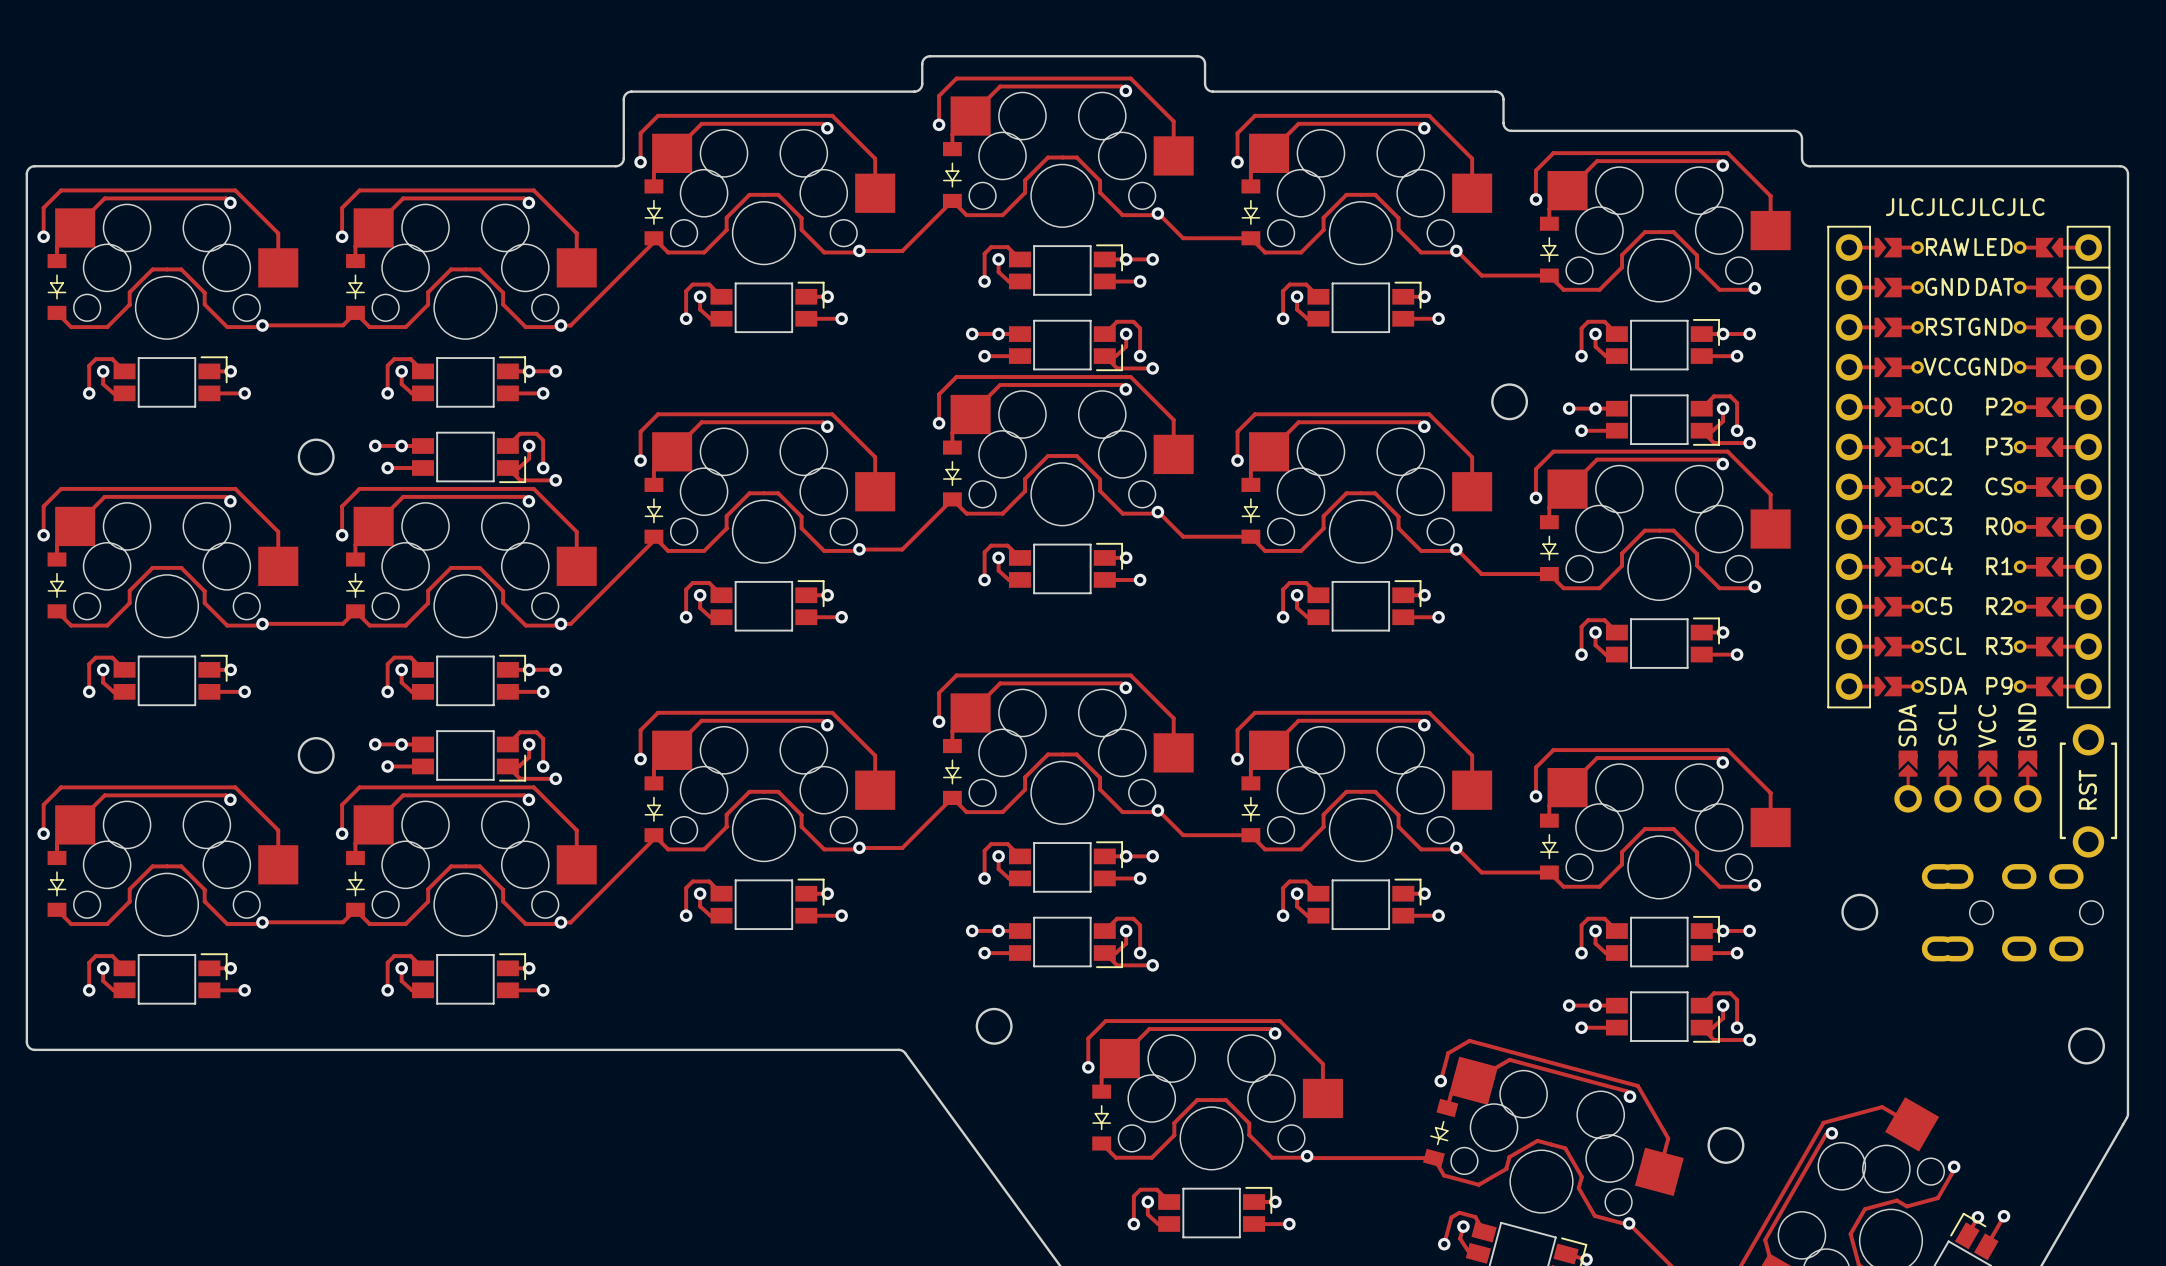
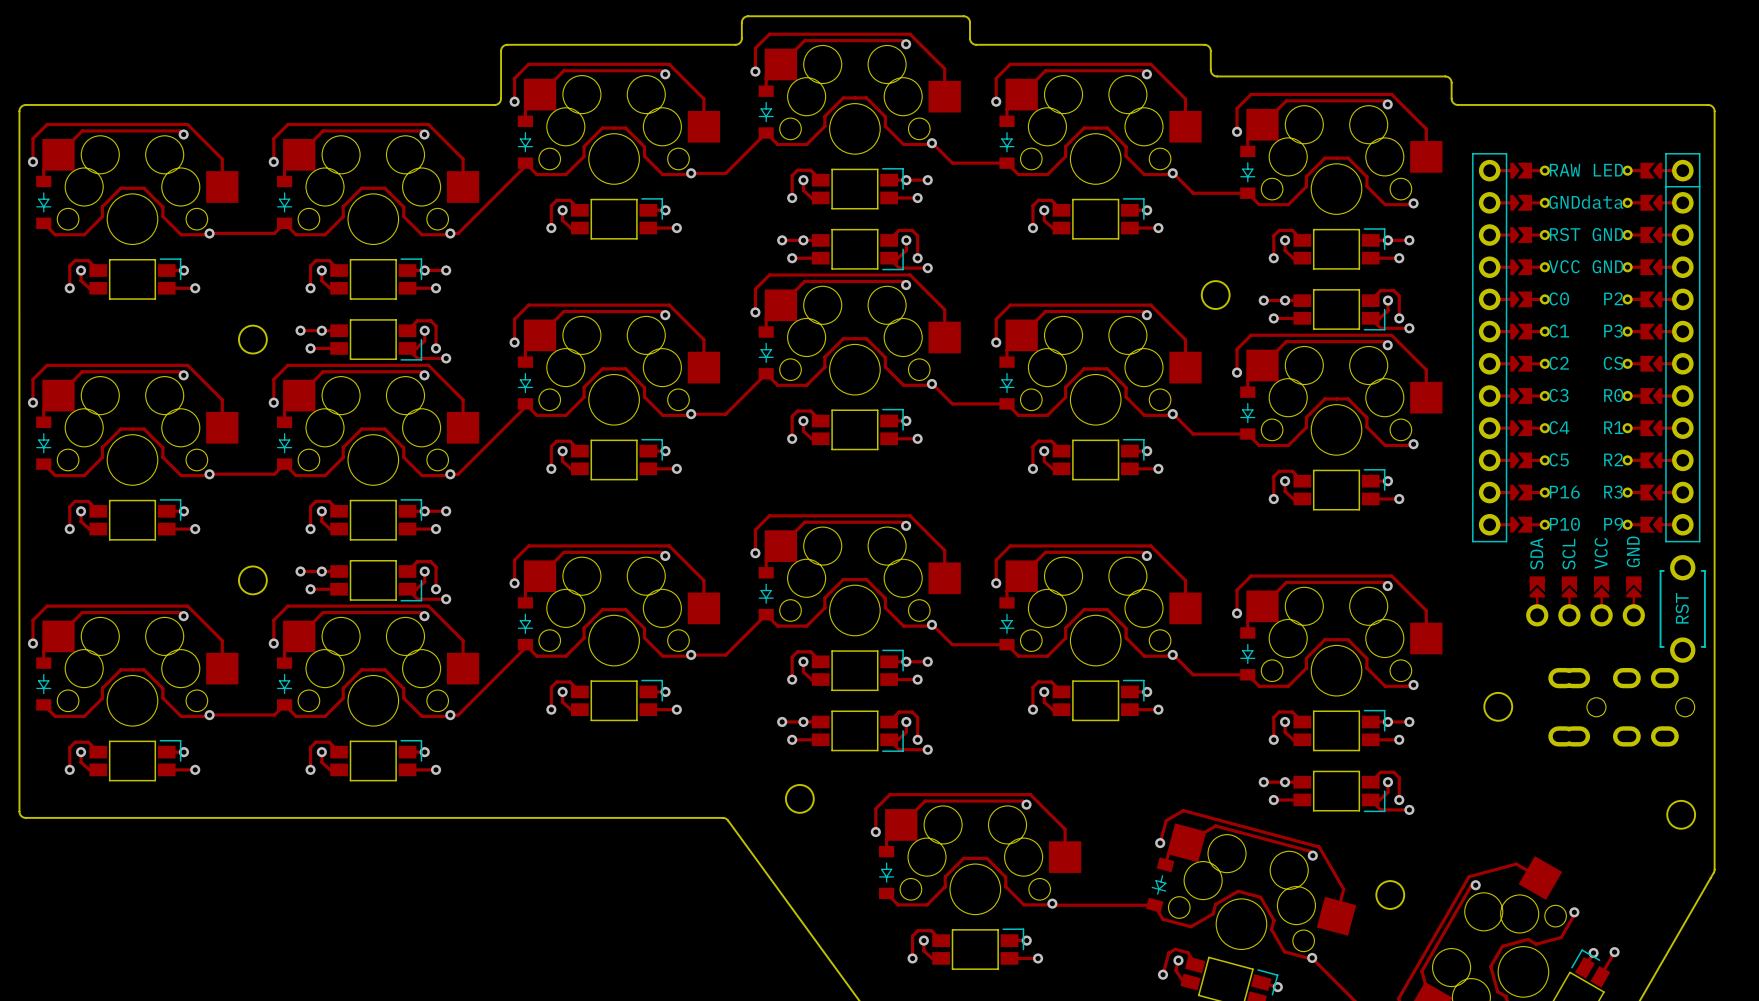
text: JLCJLCJLCJLC (1965, 207) -> none
part text: DAT (1994, 286) -> data (1602, 202)
part text: SCL (1945, 646) -> P16 (1564, 492)
part text: SDA (1946, 685) -> P10 (1564, 524)

